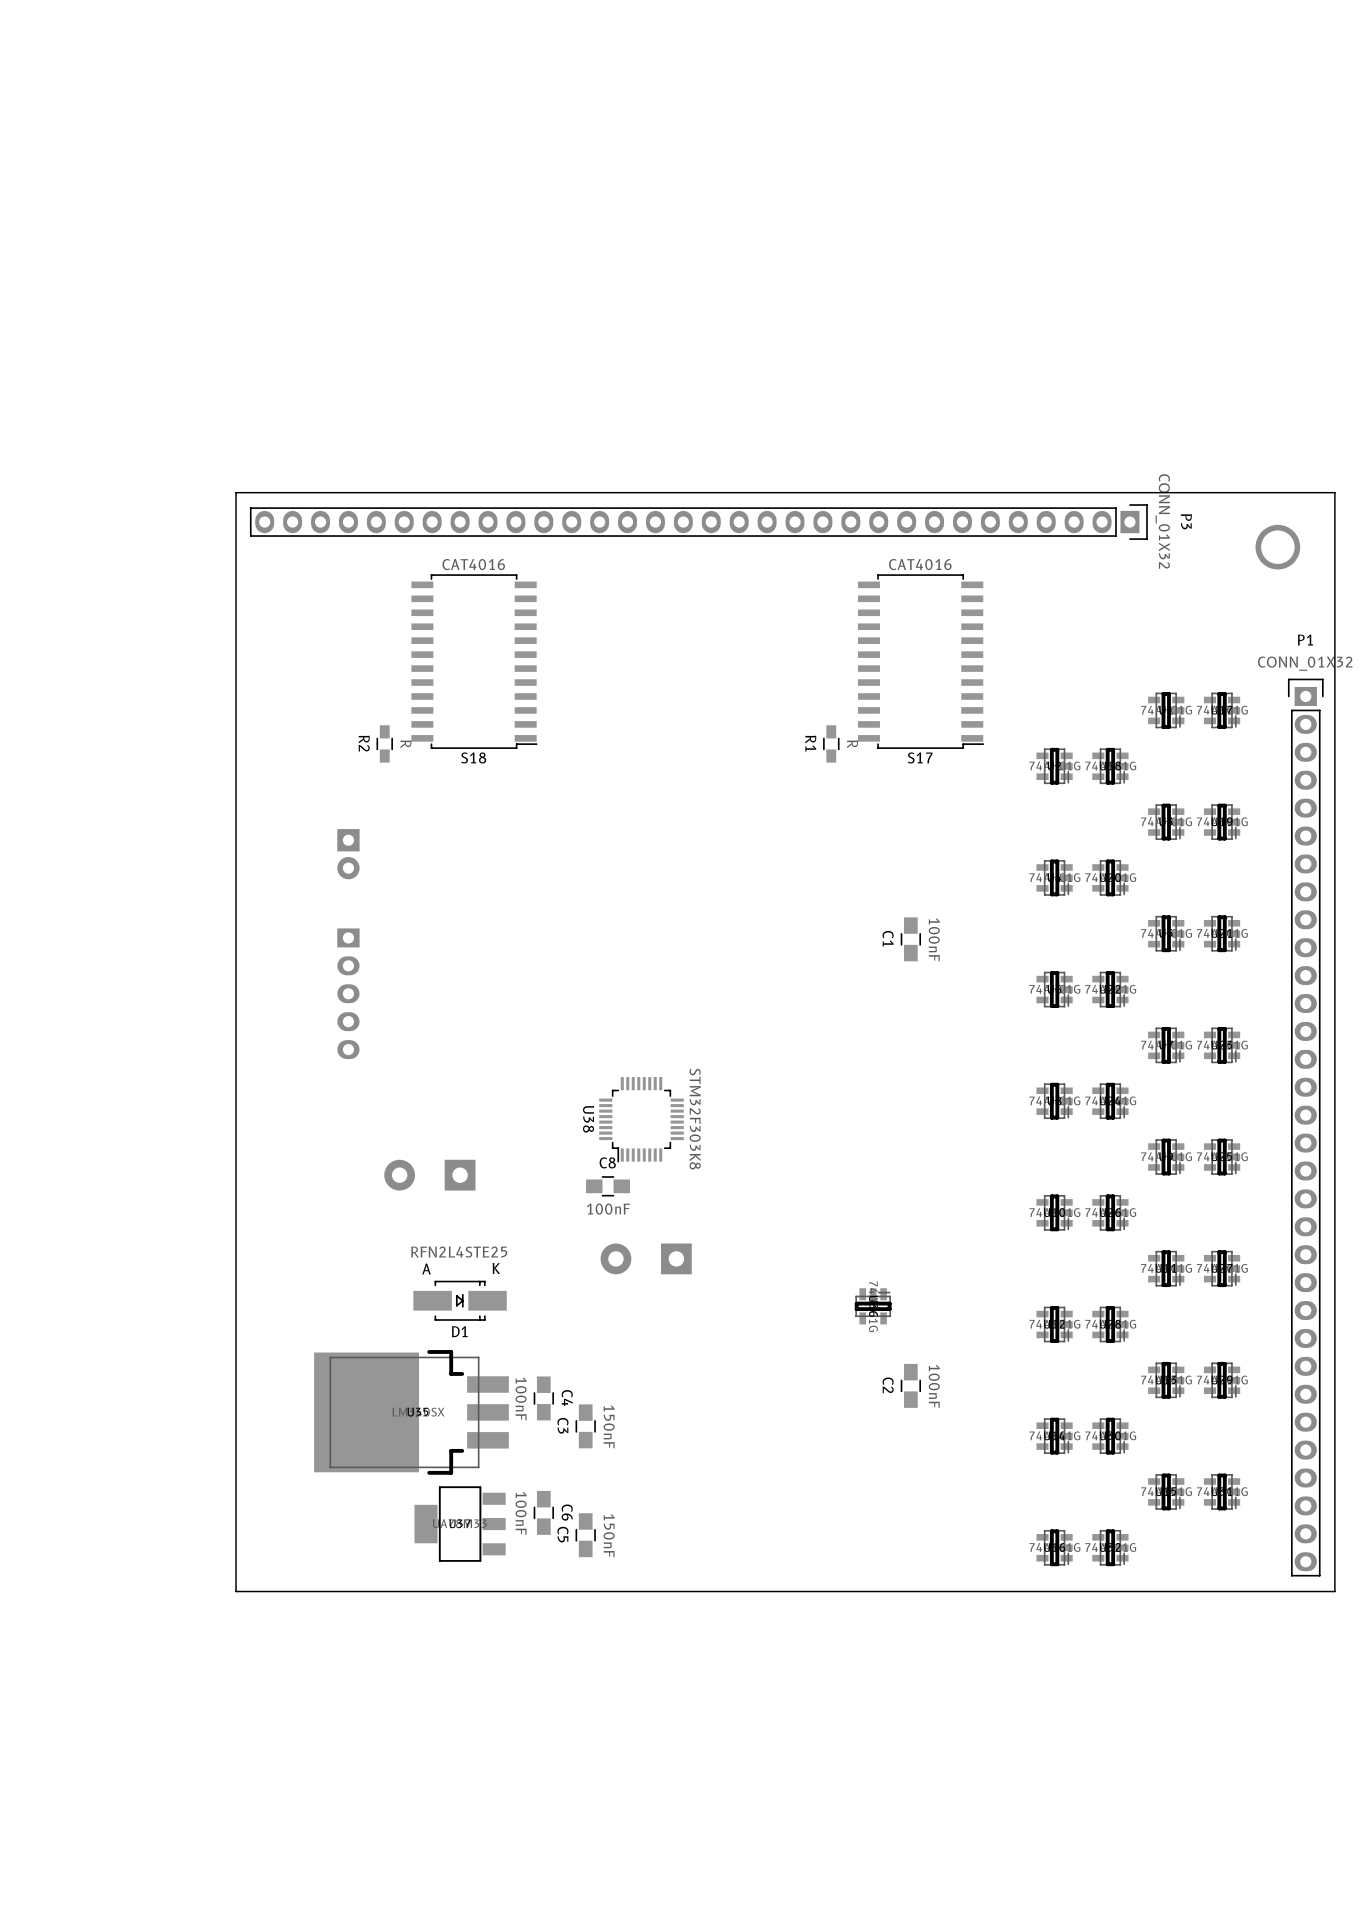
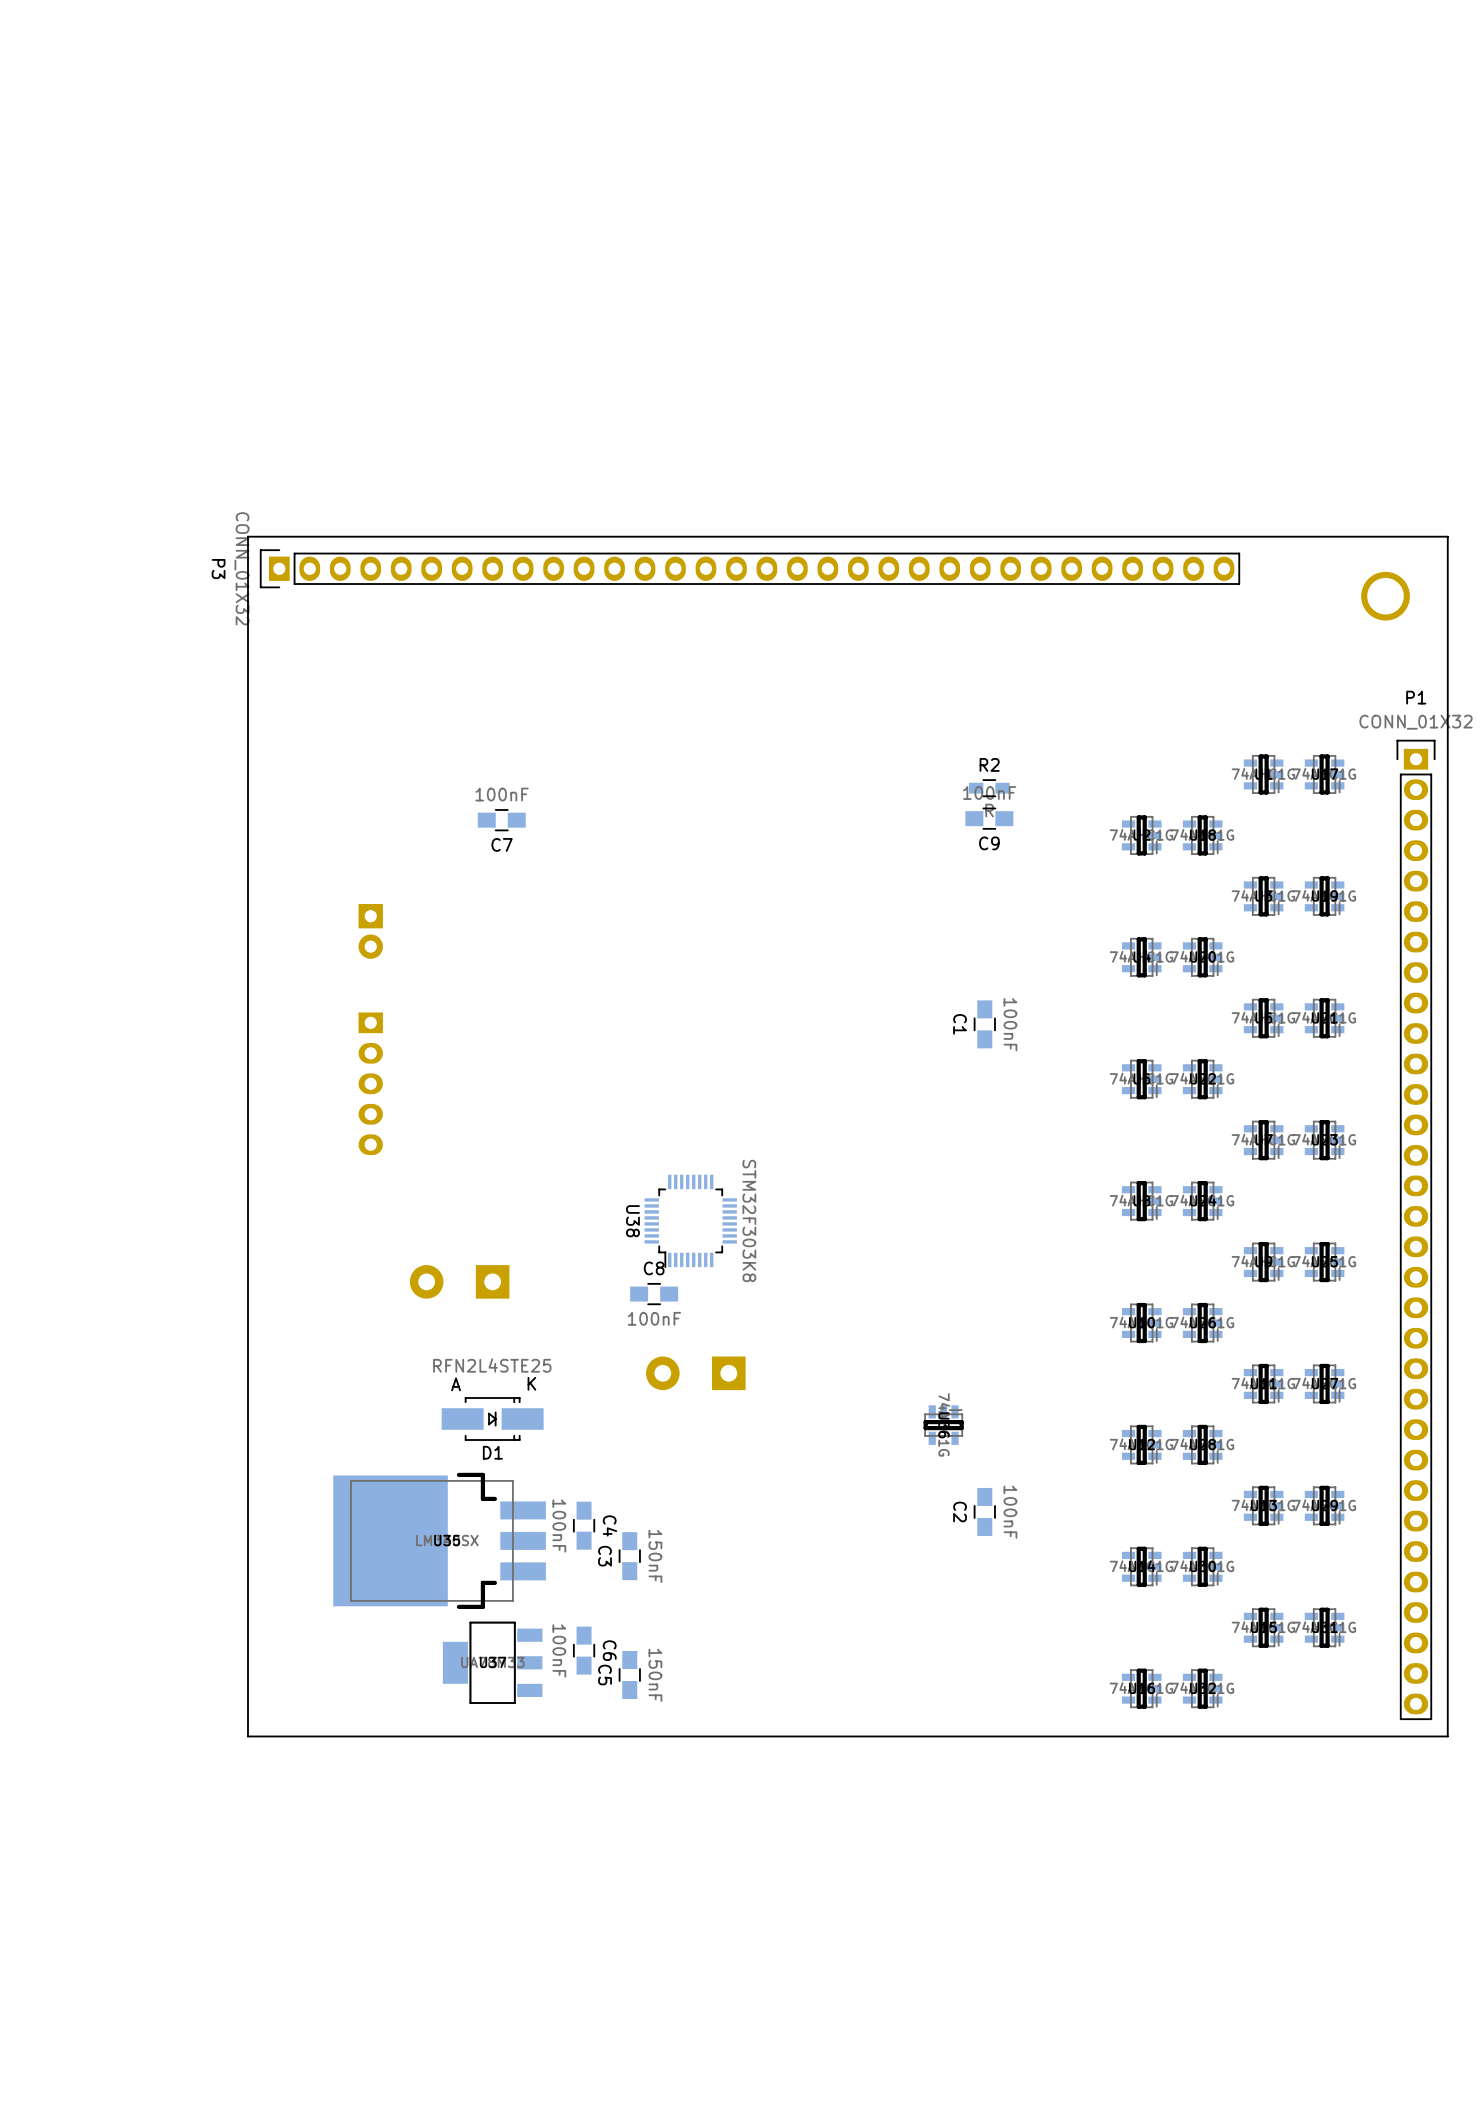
P3 rotation: 0° (698, 522) -> 180° (749, 568)
S18: CAT4016 (474, 661) -> none
S17: CAT4016 (921, 661) -> none
R2 rotation: 0° (384, 743) -> 90° clockwise (989, 788)
R2 position: (384, 743) -> (989, 788)
R1: R (831, 743) -> none
C9: none -> 100nF (989, 818)
C7: none -> 100nF (501, 820)

